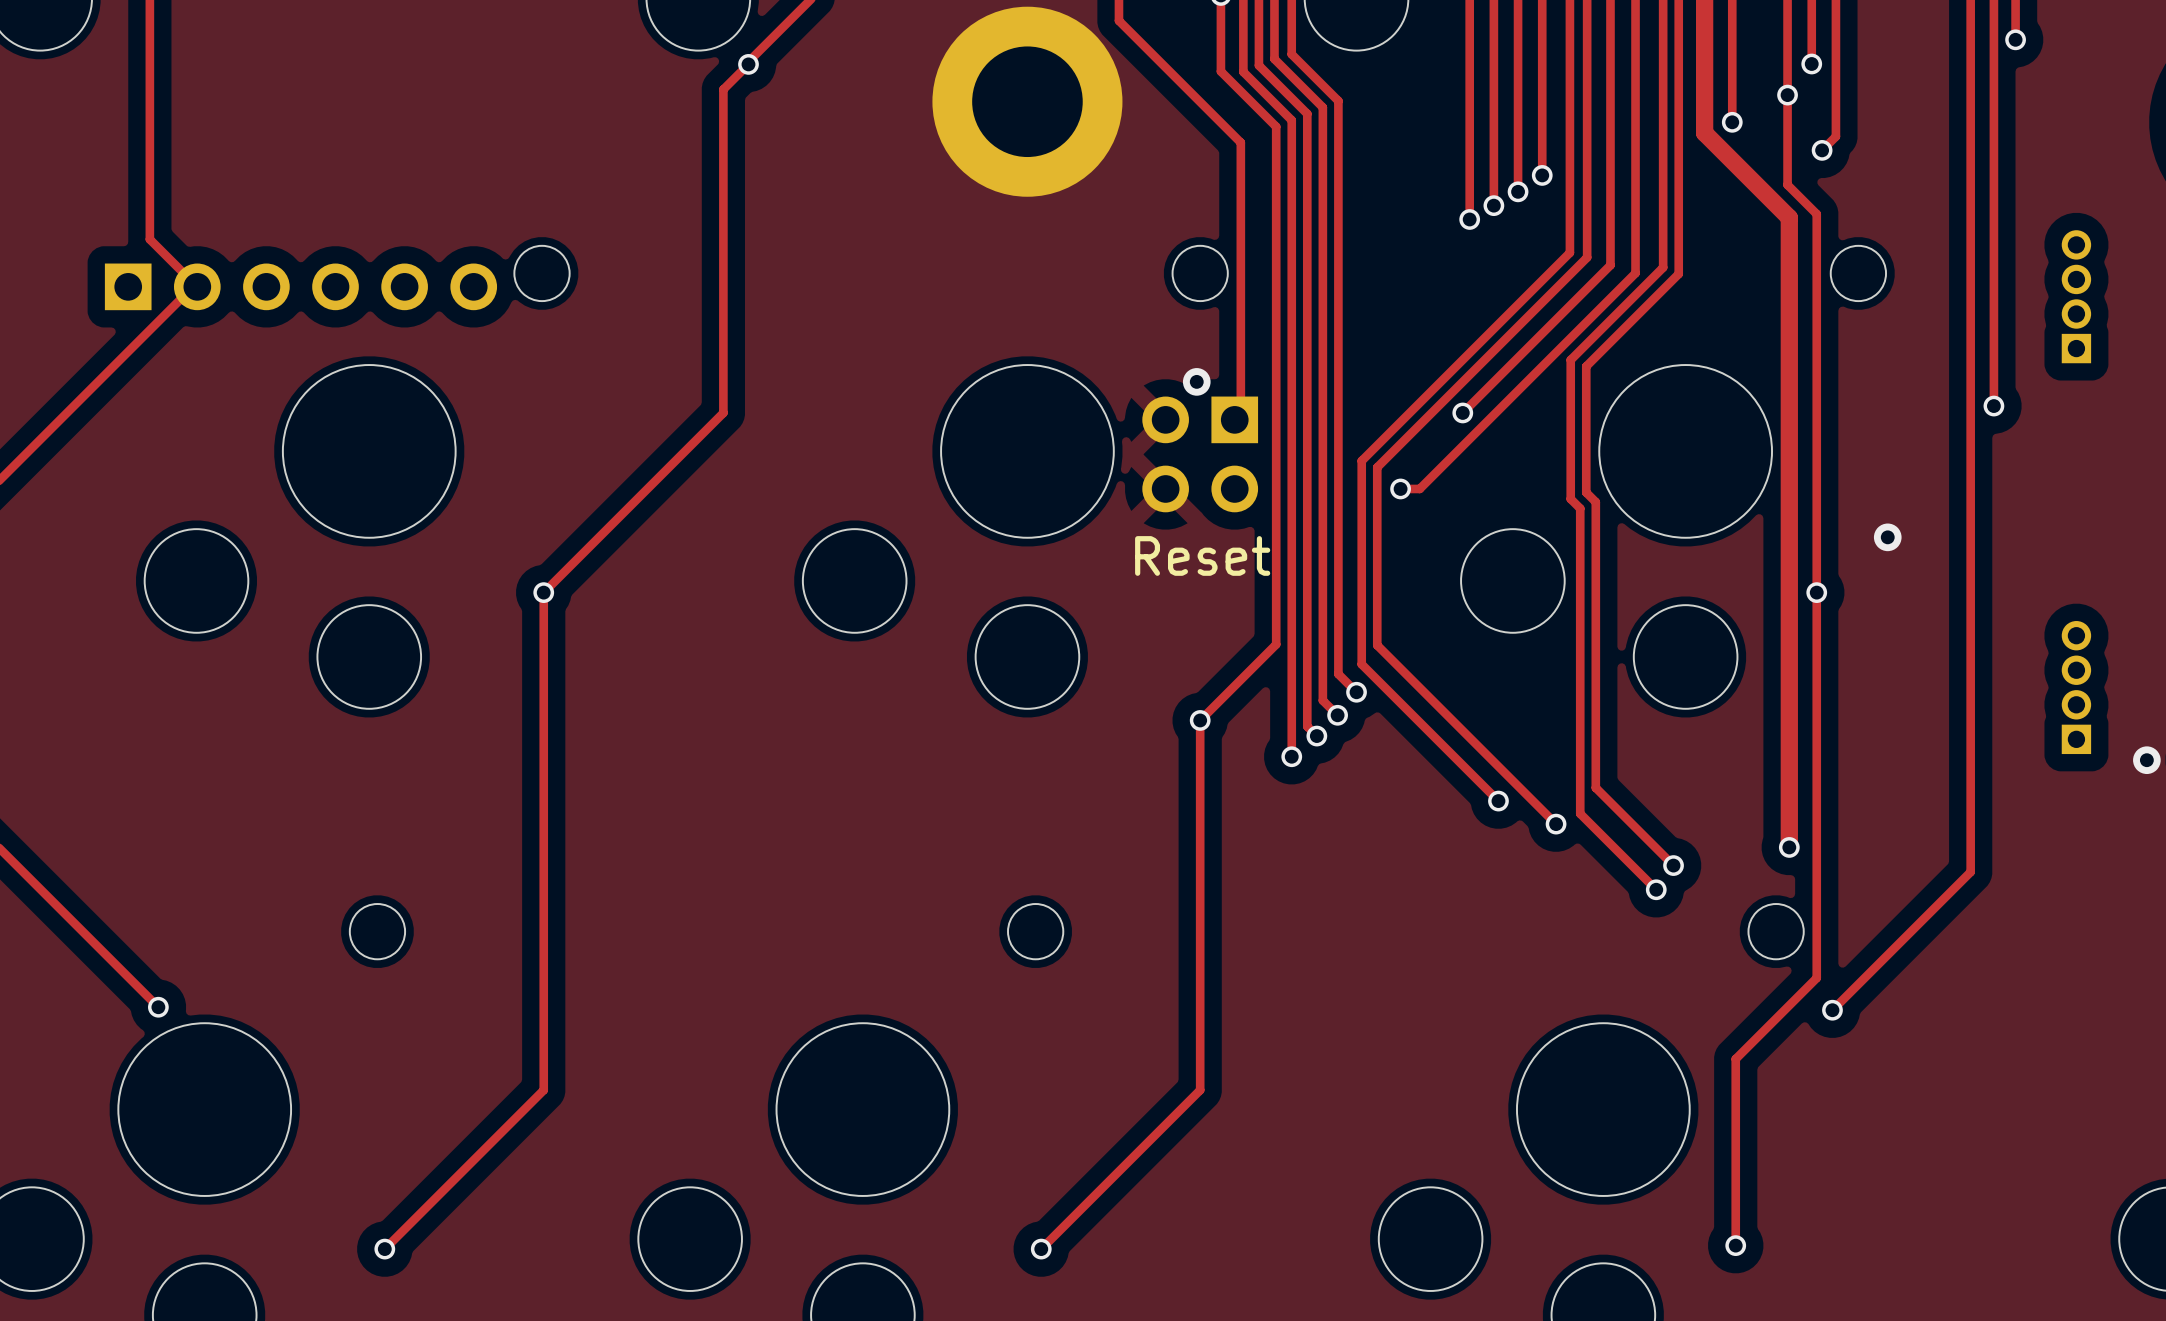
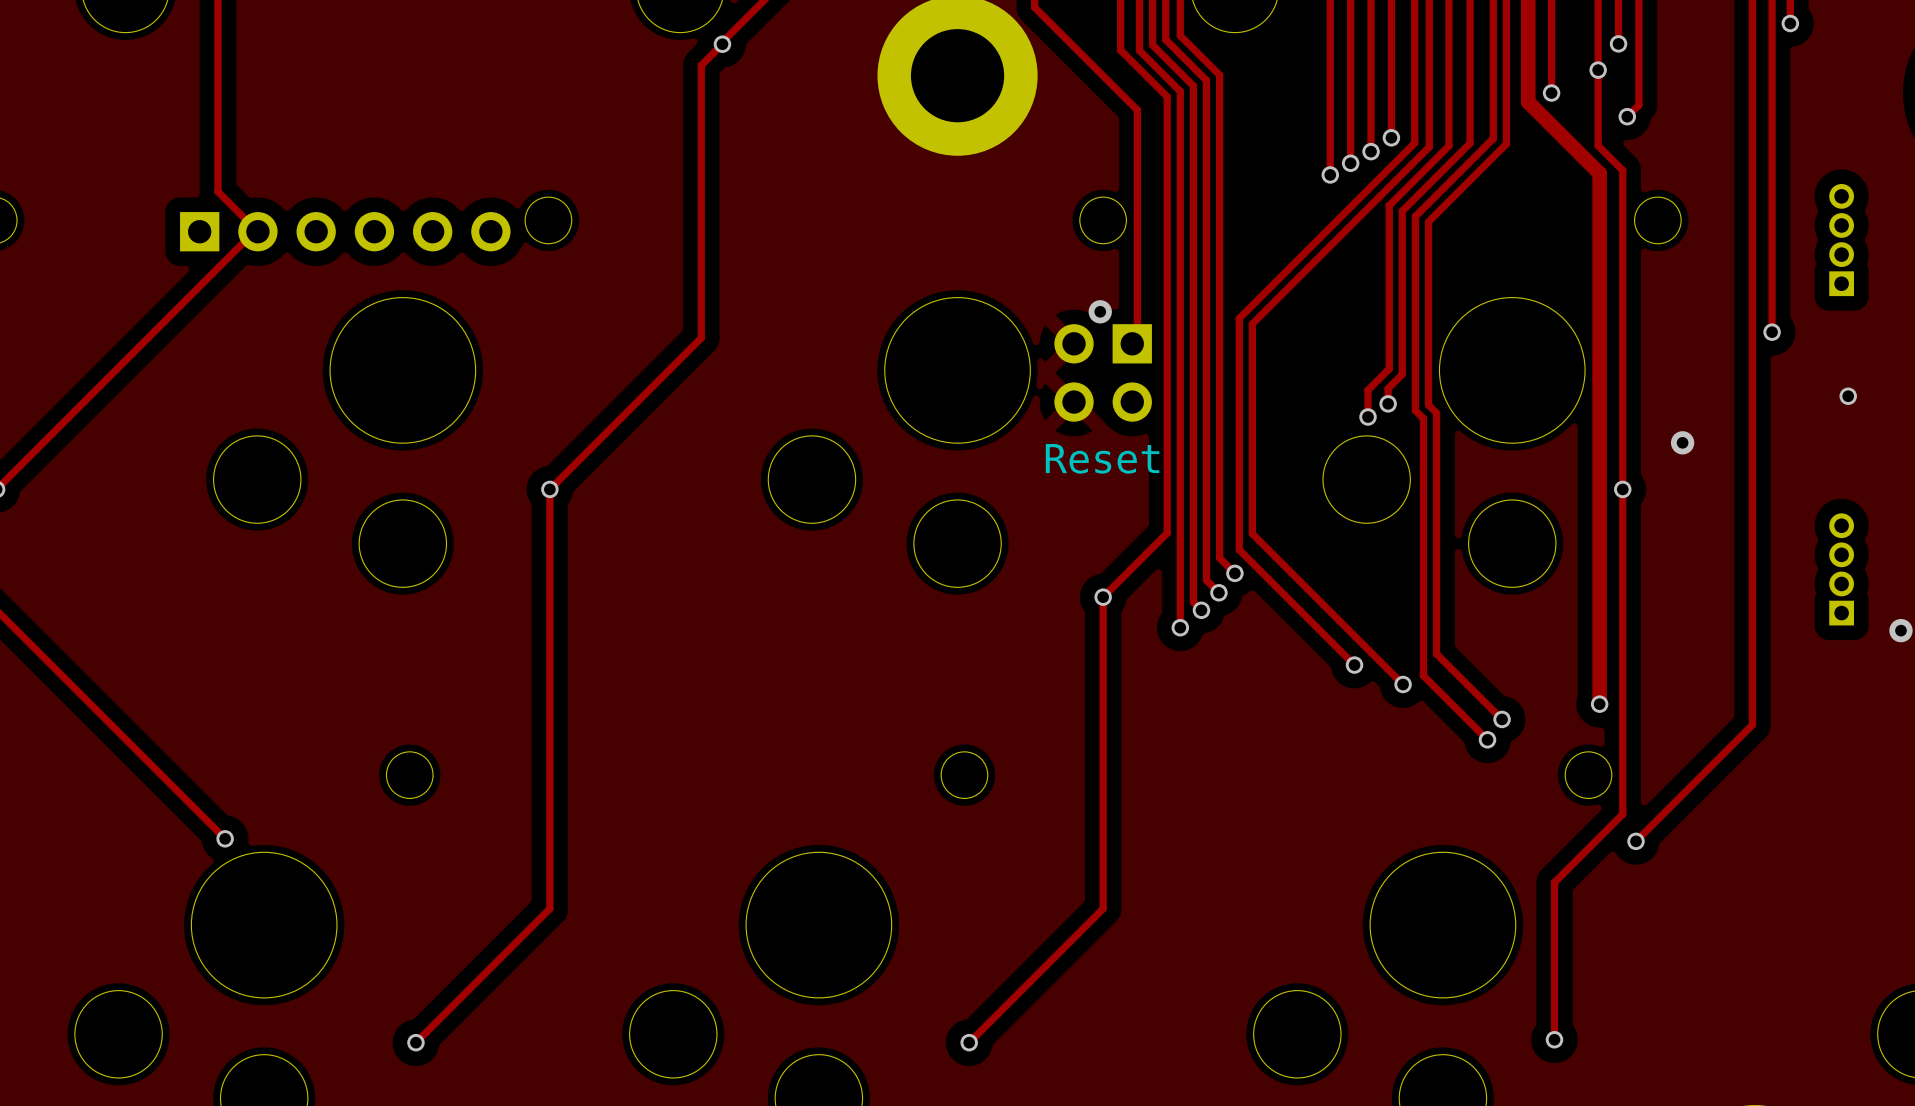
track: (1663, 176) (1663, 267) (1570, 359) -> (1493, 138) (1415, 216) (1415, 293)
track: (1569, 181) (1569, 252) (1361, 460) -> (1414, 143) (1239, 318) (1239, 378)
track: (1635, 181) (1635, 273) (1419, 488) (1400, 488) -> (1470, 143) (1402, 211) (1402, 374) (1388, 388) (1388, 403)
track: (1678, 182) (1678, 273) (1586, 366) -> (1506, 143) (1428, 221) (1428, 298)
track: (1610, 185) (1610, 265) (1462, 412) -> (1448, 145) (1389, 205) (1389, 368) (1368, 390) (1368, 417)
track: (1587, 186) (1587, 257) (1377, 467) -> (1429, 147) (1252, 323) (1252, 383)
via: (1462, 412) -> none
via: none -> (1848, 396)
via: (1400, 488) -> none
via: none -> (1388, 403)
via: none -> (1368, 417)

